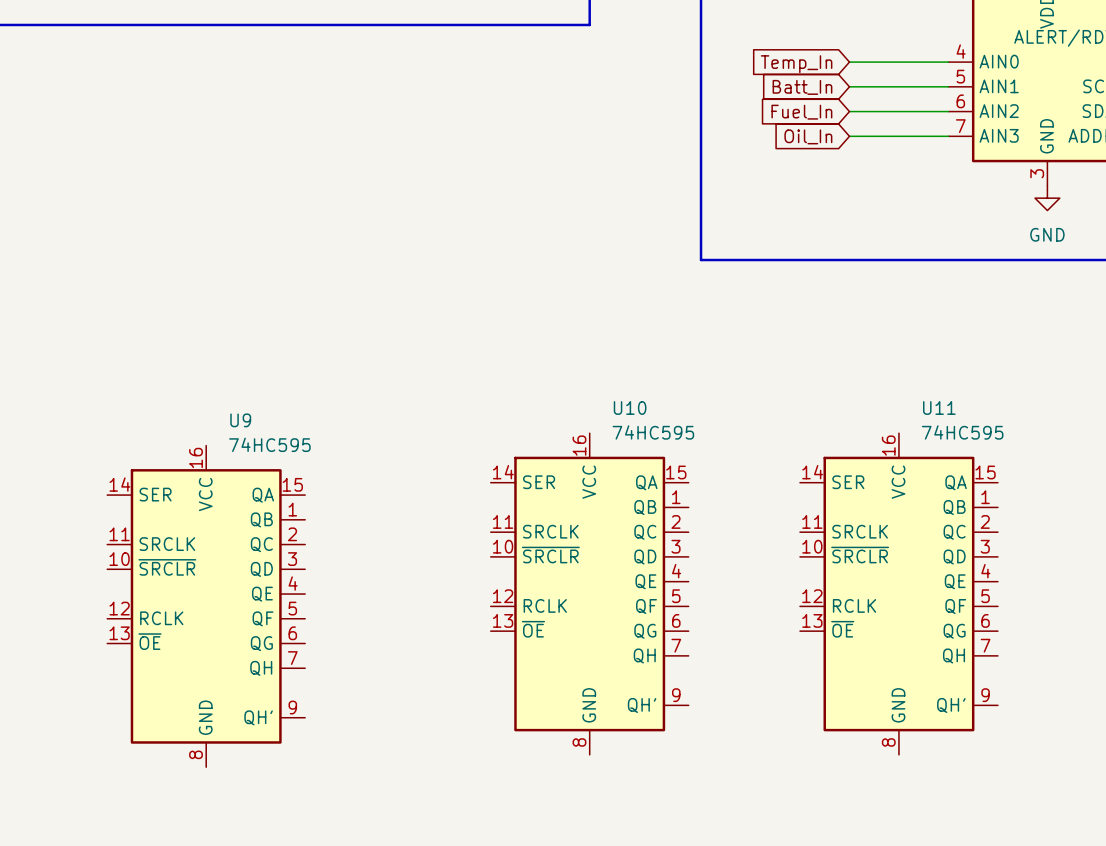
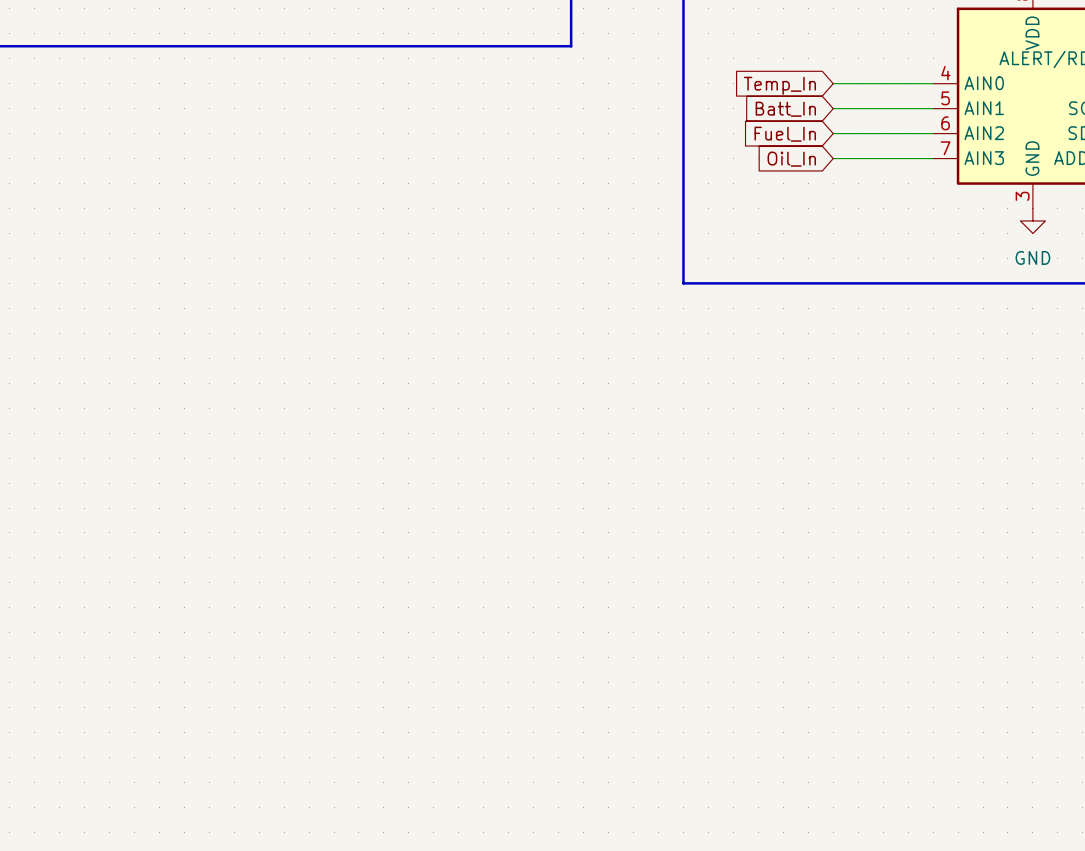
U10: 74HC595 (589, 594) -> none
U11: 74HC595 (898, 594) -> none
U9: 74HC595 (206, 606) -> none

